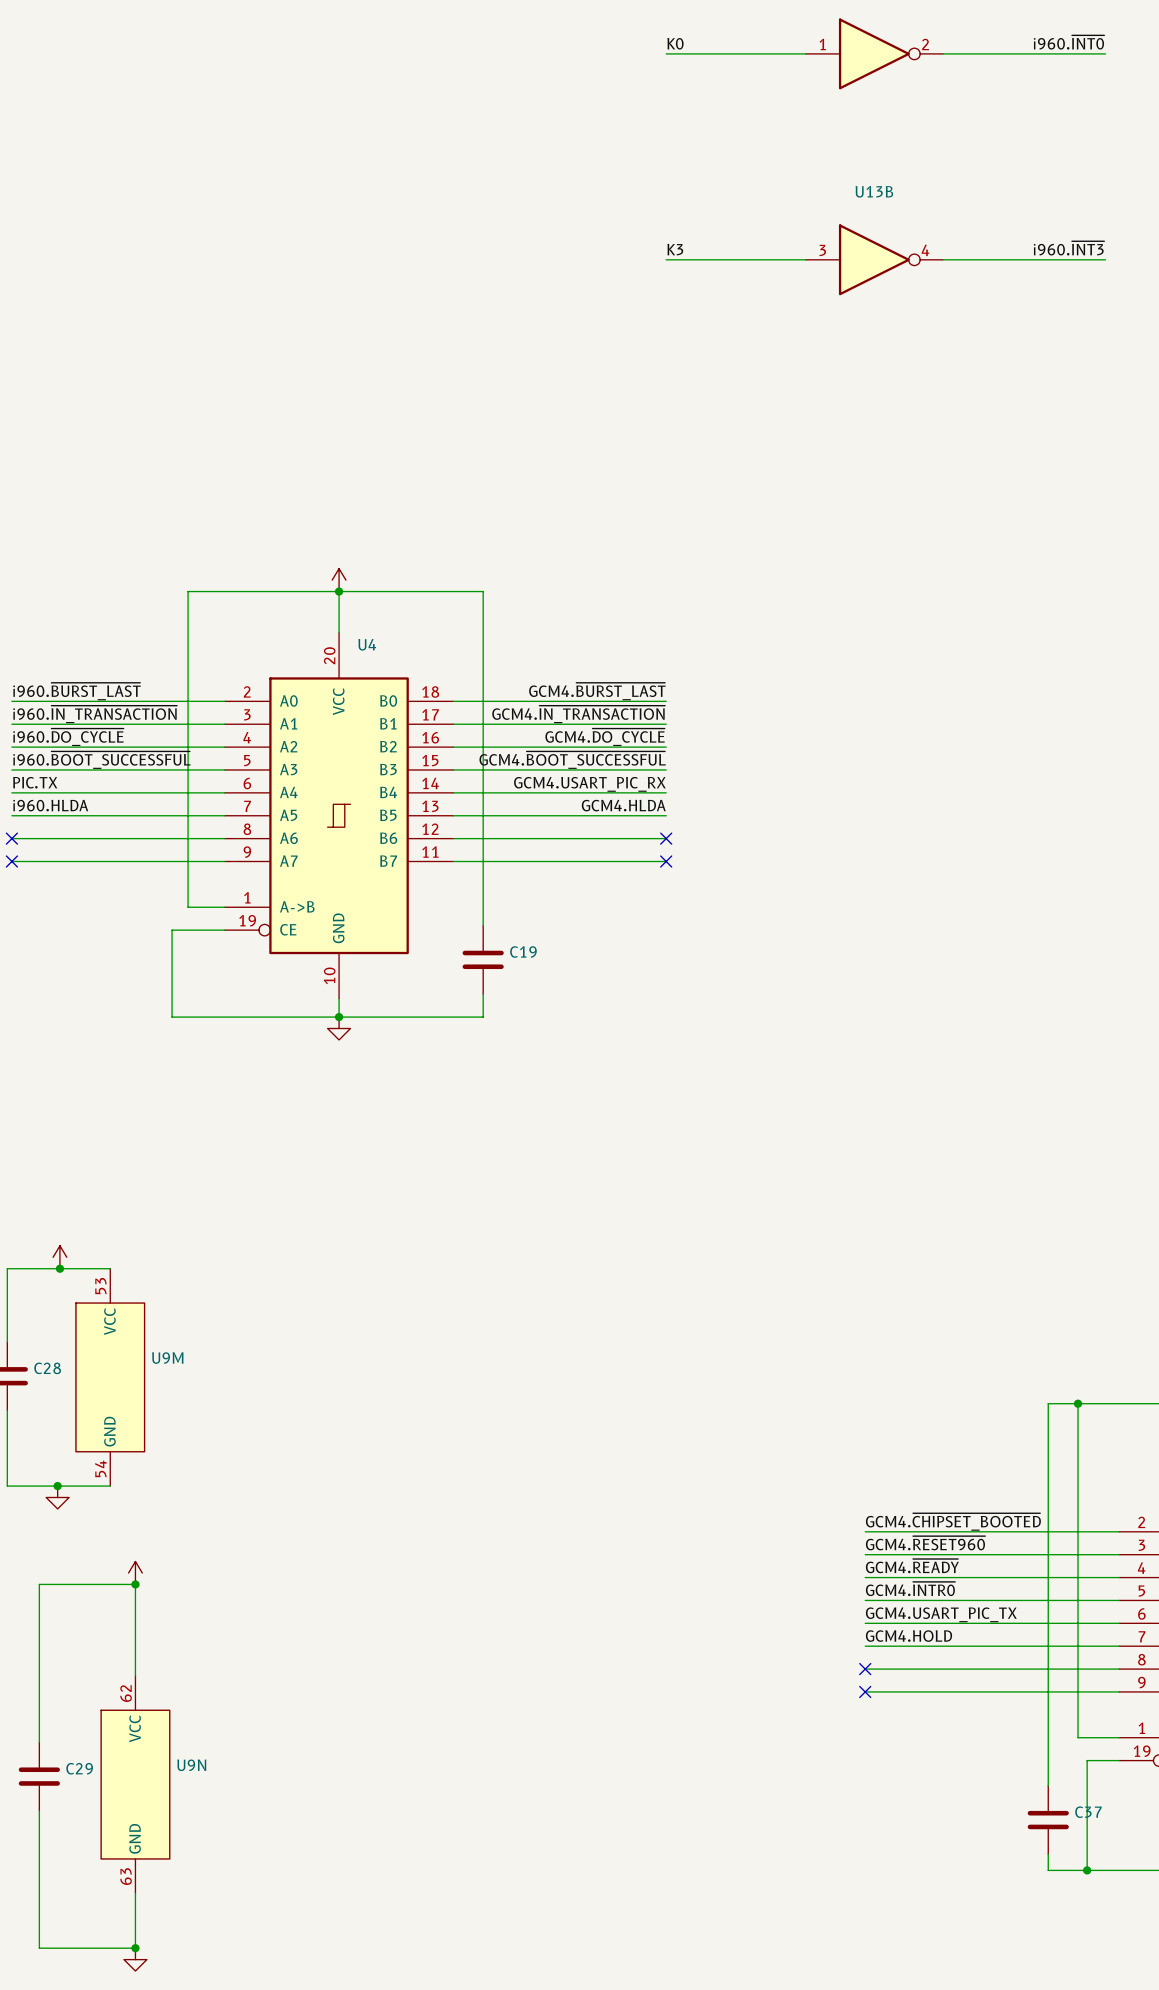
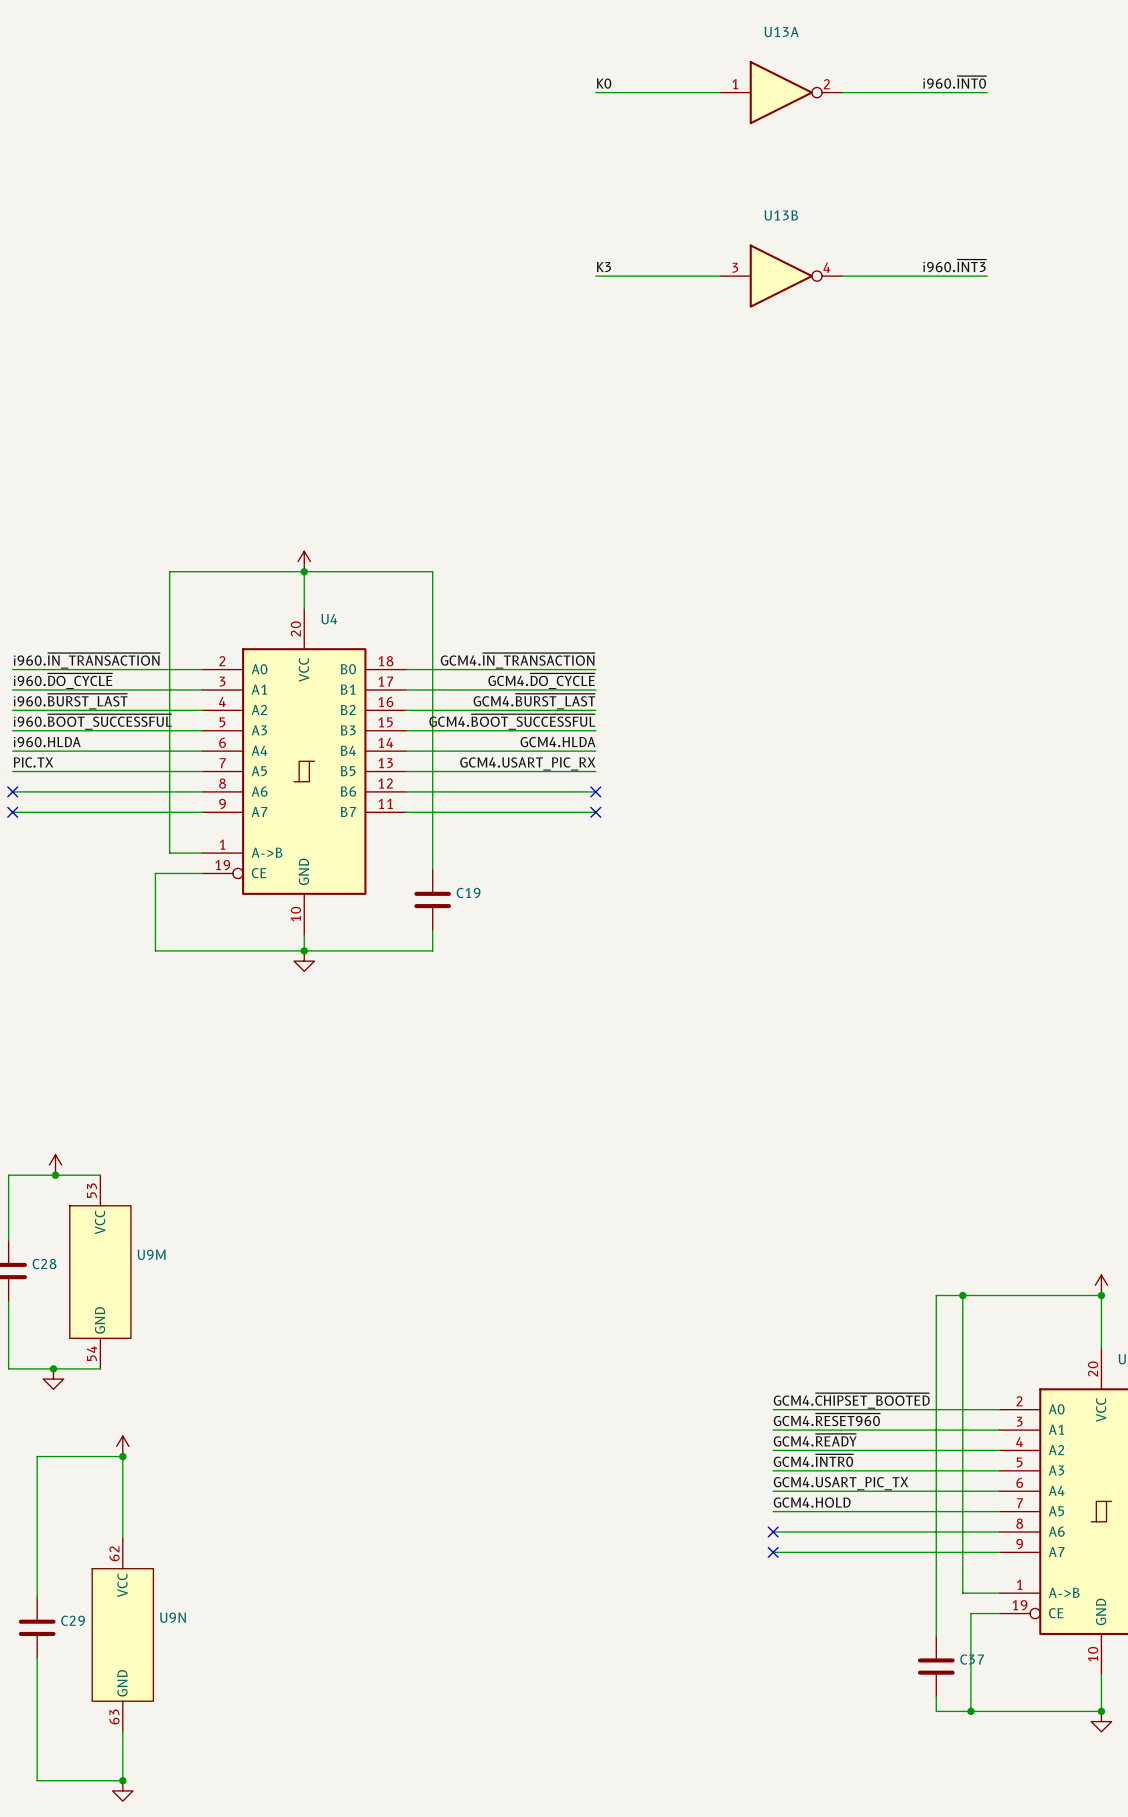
label: i960.~{BURST_LAST} (77, 691) -> i960.~{IN_TRANSACTION} (86, 660)
label: GCM4.~{BURST_LAST} (597, 691) -> GCM4.~{IN_TRANSACTION} (517, 660)
label: i960.~{IN_TRANSACTION} (95, 714) -> i960.~{DO_CYCLE} (63, 681)
label: GCM4.~{IN_TRANSACTION} (578, 714) -> GCM4.~{DO_CYCLE} (541, 681)
label: i960.~{DO_CYCLE} (68, 737) -> i960.~{BURST_LAST} (70, 701)
label: GCM4.~{DO_CYCLE} (605, 737) -> GCM4.~{BURST_LAST} (534, 701)
label: PIC.TX (35, 782) -> i960.HLDA (47, 742)
label: GCM4.USART_PIC_RX (589, 784) -> GCM4.HLDA (557, 742)
label: i960.HLDA (50, 805) -> PIC.TX (33, 762)
label: GCM4.HLDA (623, 805) -> GCM4.USART_PIC_RX (527, 763)

